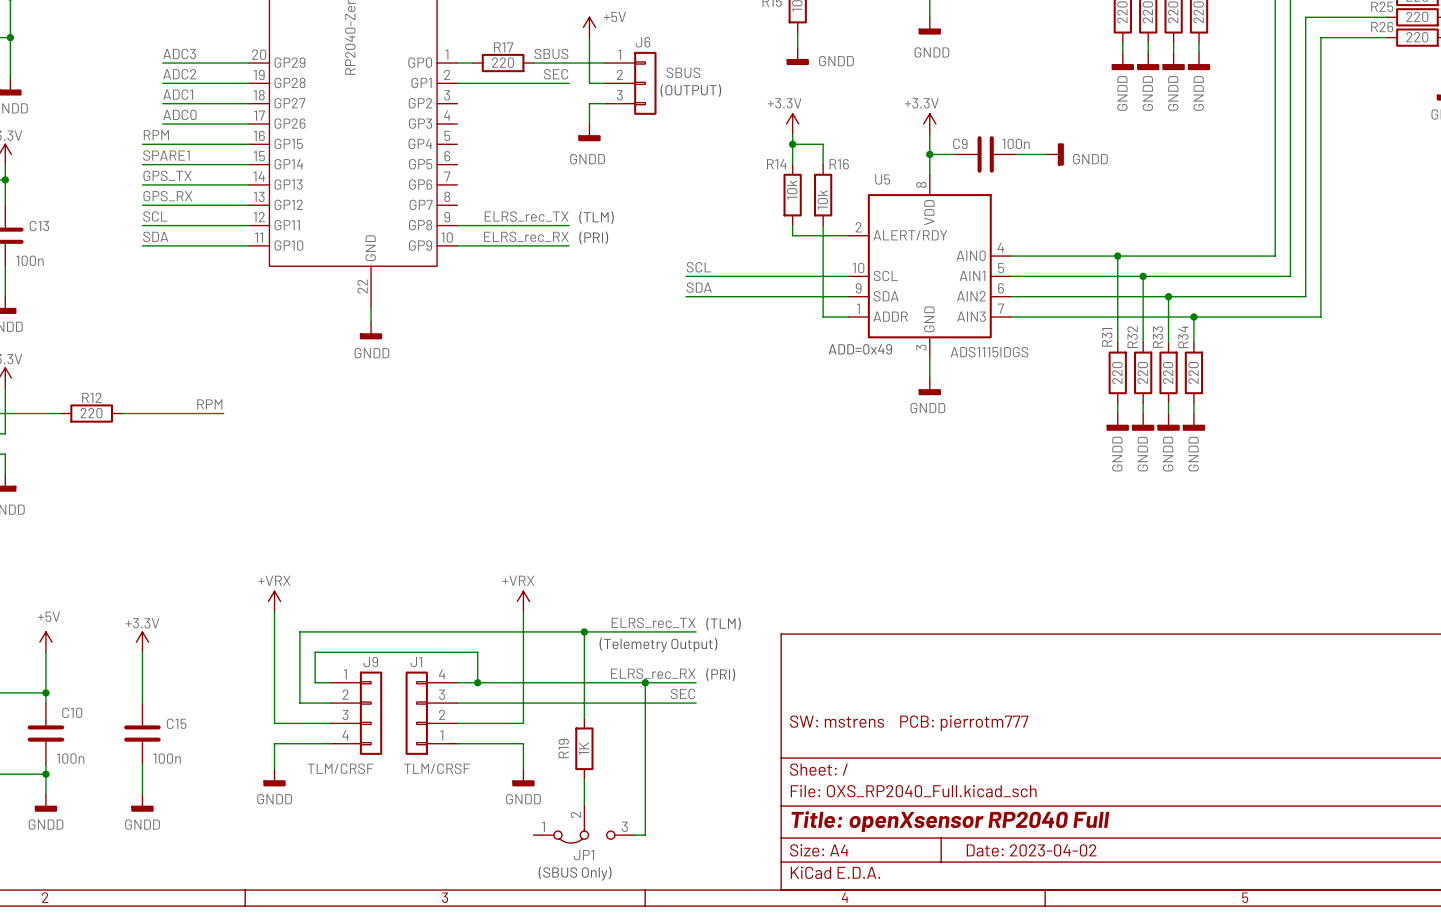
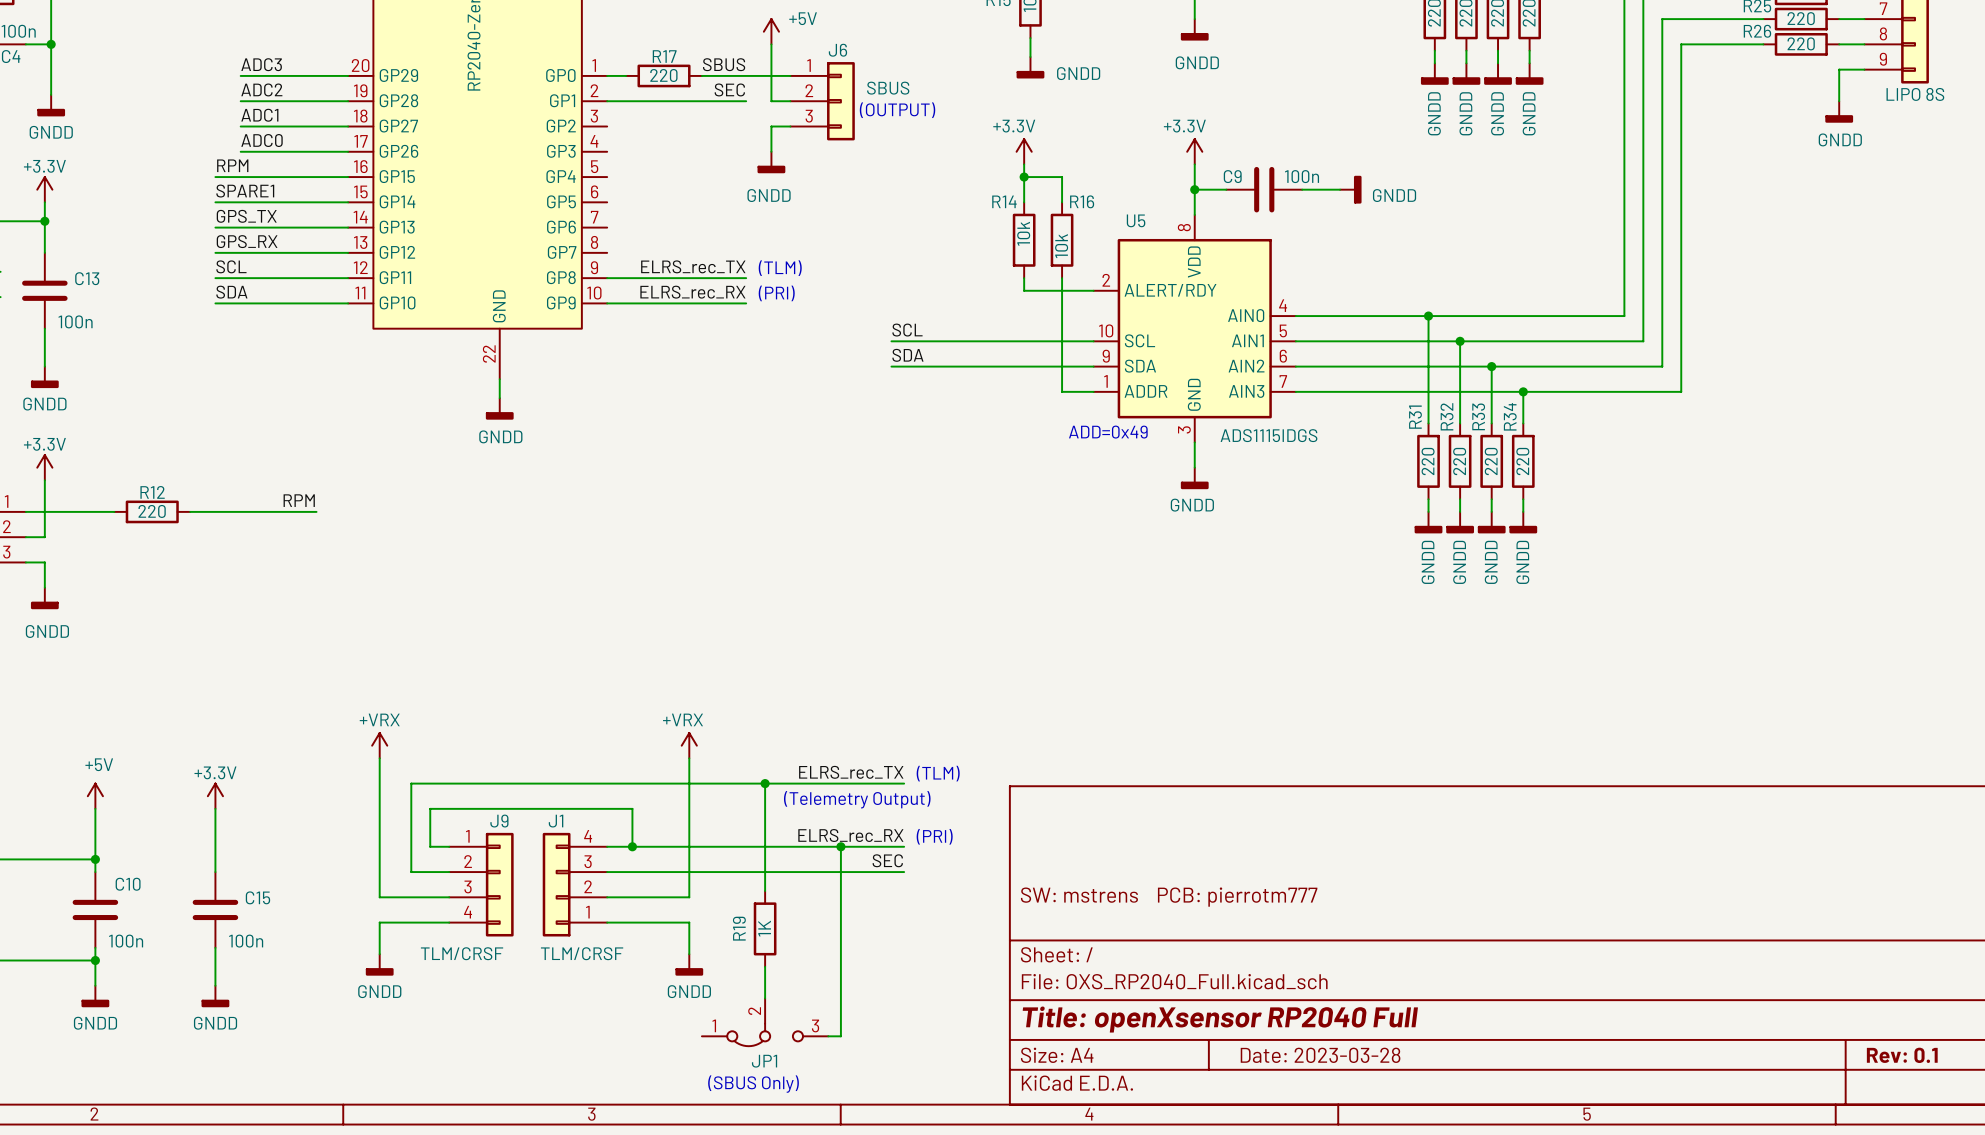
title block: Date: 2023-04-02 (1031, 850) -> Date: 2023-03-28 (1320, 1055)

